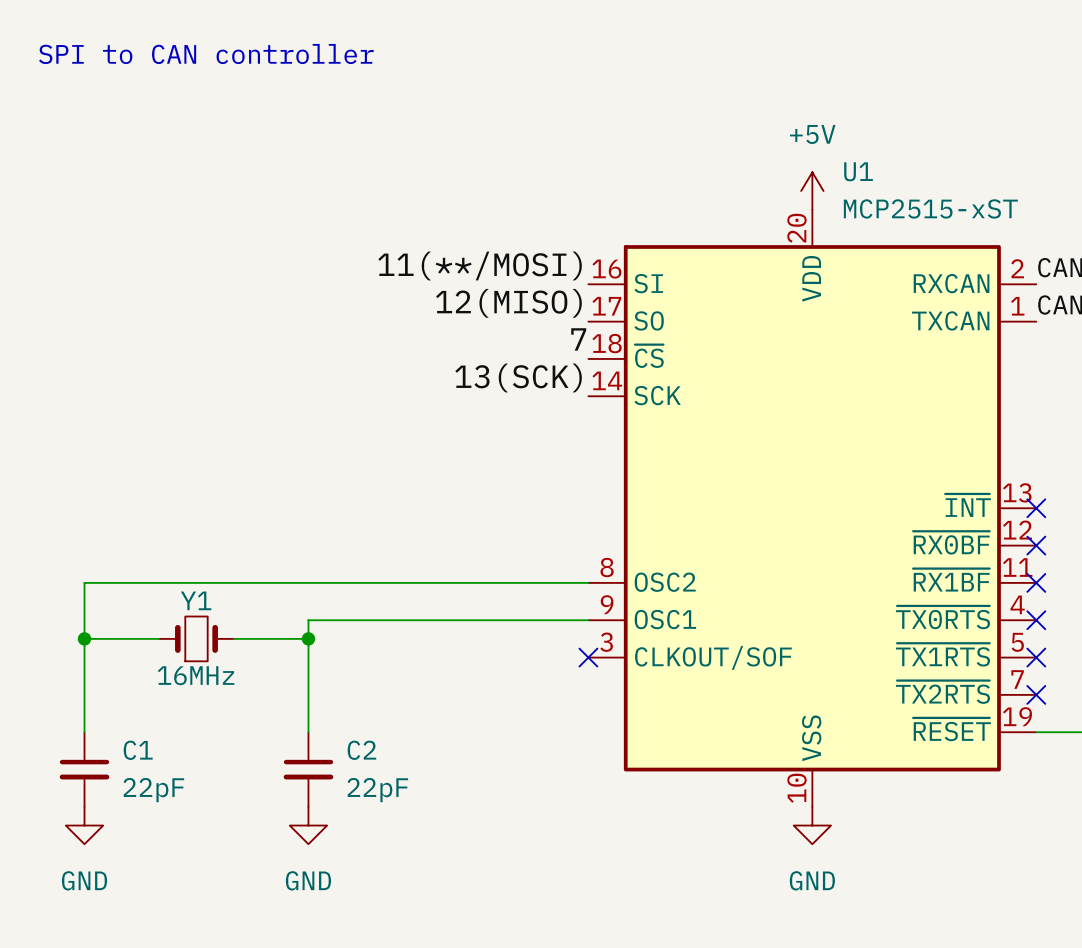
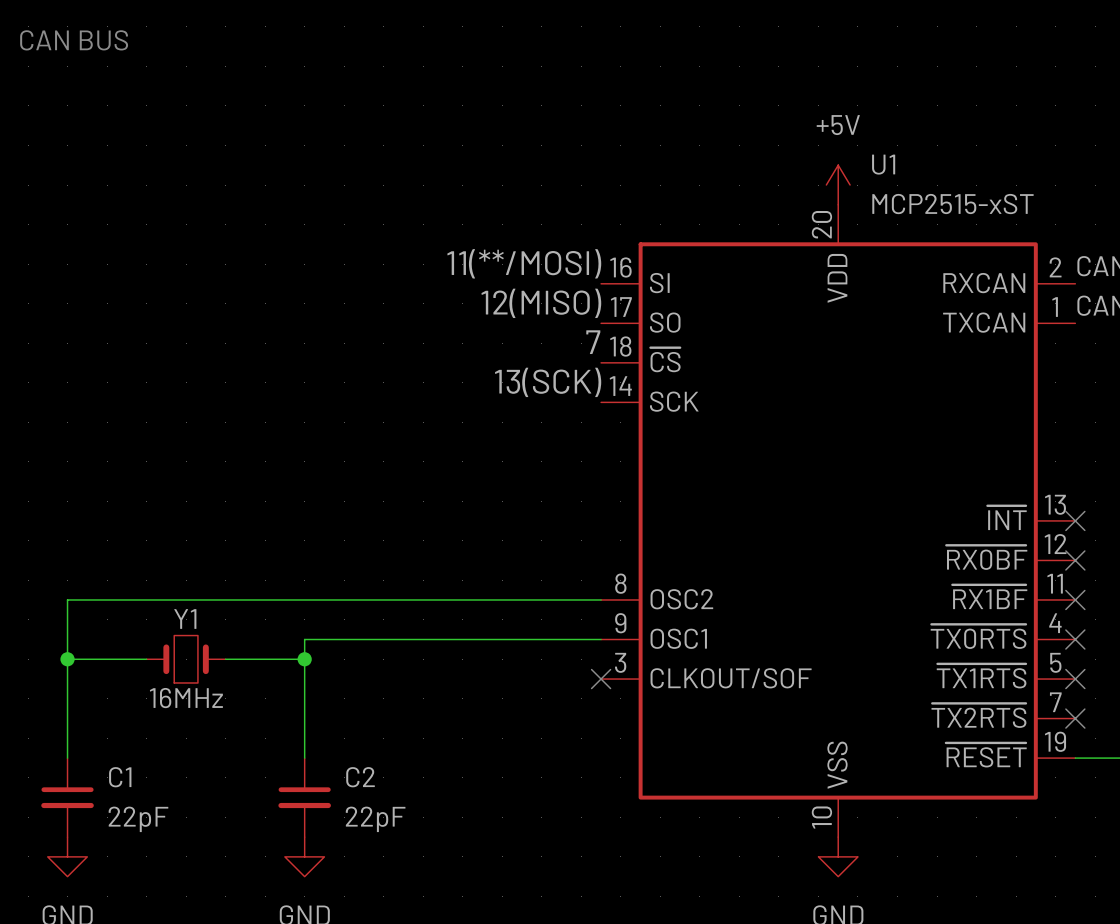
text: SPI to CAN controller (206, 54) -> CAN BUS (74, 40)

